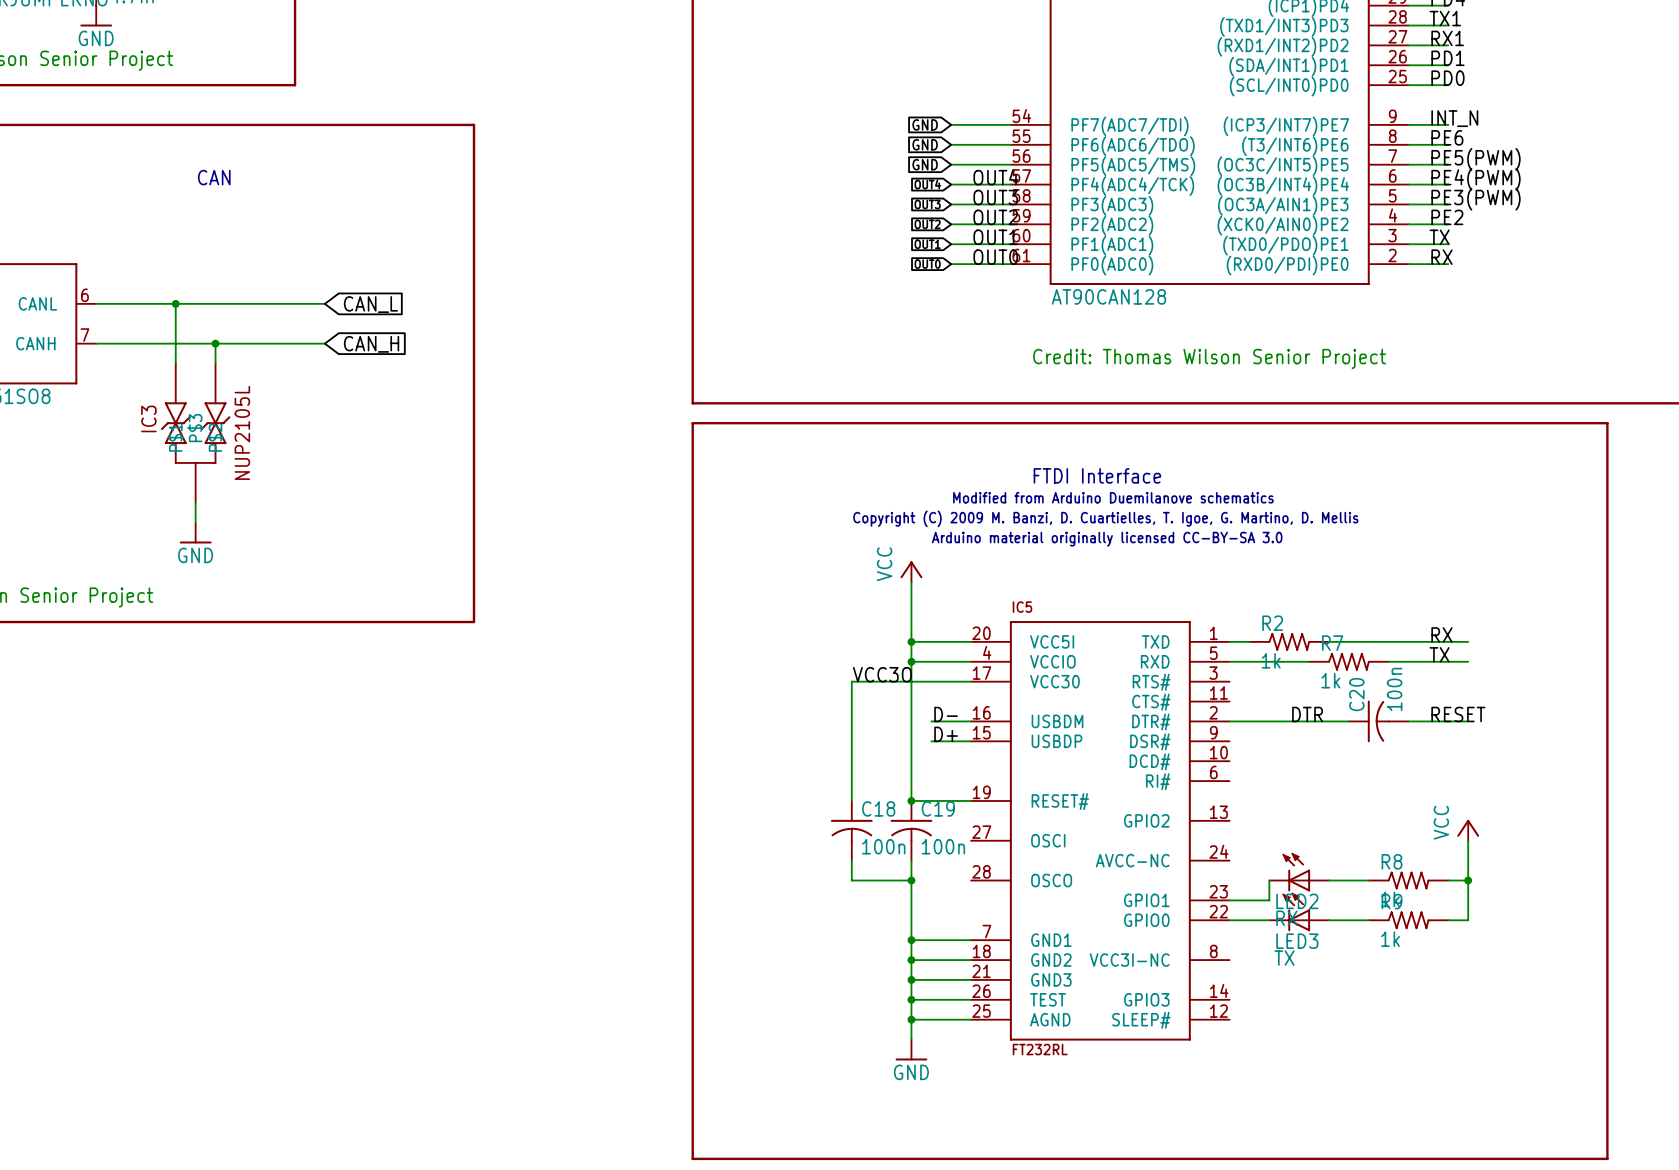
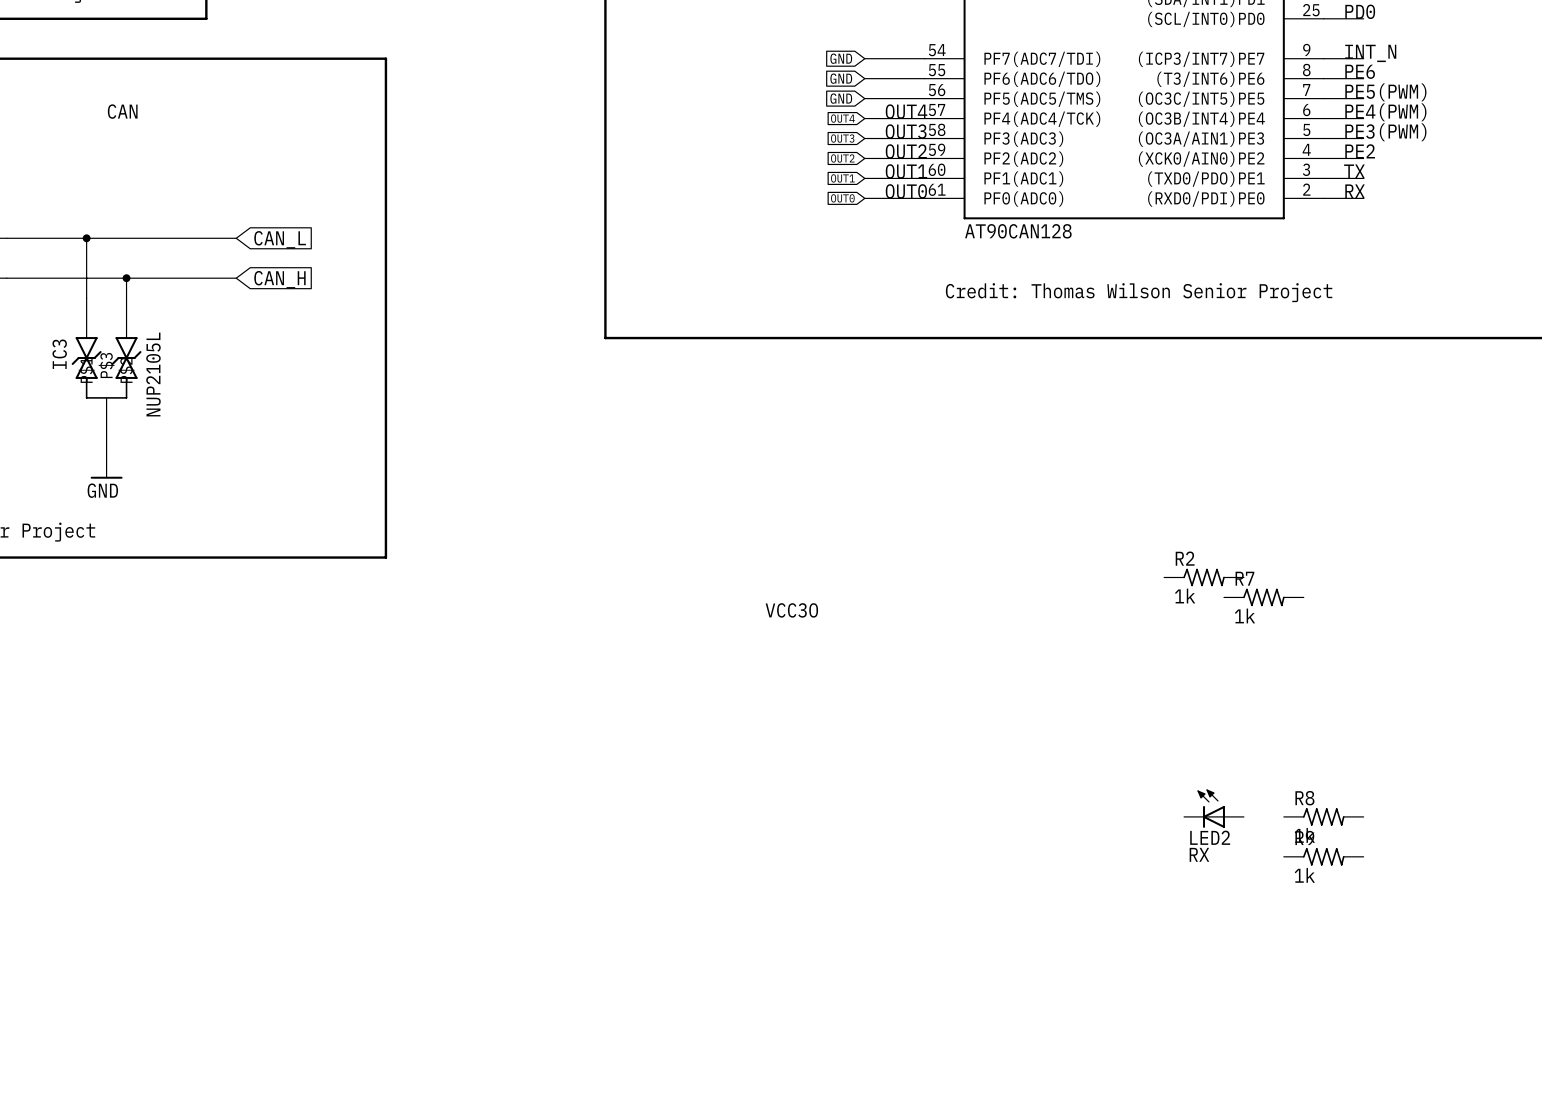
line: (692, 423) (1607, 423) (1607, 1158) (692, 1158) (692, 423) -> none
text: FTDI Interface (1097, 475) -> none
text: Modified from Arduino Duemilanove schematics (1113, 497) -> none
text: Copyright (C) 2009 M. Banzi, D. Cuartielles, T. Igoe, G. Martino, D. Mellis (1105, 518) -> none
text: Arduino material originally licensed CC-BY-SA 3.0 (1107, 539) -> none
power symbol: VCC (911, 571) -> none
wire: (911, 582) (911, 800) (971, 800) -> none
label: RX (1441, 634) -> none
wire: (911, 641) (971, 641) -> none
junction: (911, 641) -> none
wire: (1229, 641) (1249, 641) -> none
wire: (1329, 641) (1468, 641) -> none
label: TX (1439, 654) -> none
wire: (911, 661) (971, 661) -> none
junction: (911, 661) -> none
wire: (1229, 661) (1309, 661) -> none
wire: (1388, 661) (1468, 661) -> none
wire: (971, 681) (851, 681) (851, 800) -> none
label: D- (946, 714) -> none
label: DTR (1307, 714) -> none
label: RESET (1458, 714) -> none
wire: (931, 721) (971, 721) -> none
wire: (1229, 721) (1348, 721) -> none
C20: 100n (1378, 721) -> none
wire: (1408, 721) (1468, 721) -> none
label: D+ (946, 734) -> none
wire: (931, 741) (971, 741) -> none
junction: (911, 800) -> none
C18: 100n (851, 830) -> none
C19: 100n (911, 830) -> none
IC5: FT232RL (1100, 830) -> none
power symbol: VCC (1468, 830) -> none
wire: (1468, 840) (1468, 920) (1448, 920) -> none
wire: (851, 860) (851, 880) (911, 880) -> none
wire: (911, 860) (911, 1039) -> none
junction: (911, 880) -> none
wire: (1269, 880) (1269, 900) (1229, 900) -> none
wire: (1329, 880) (1368, 880) -> none
wire: (1448, 880) (1468, 880) -> none
junction: (1468, 880) -> none
LED3: TX (1299, 912) -> none
wire: (1229, 920) (1269, 920) -> none
wire: (1329, 920) (1368, 920) -> none
wire: (911, 940) (971, 940) -> none
junction: (911, 940) -> none
wire: (911, 960) (971, 960) -> none
junction: (911, 960) -> none
wire: (911, 979) (971, 979) -> none
junction: (911, 979) -> none
wire: (911, 999) (971, 999) -> none
junction: (911, 999) -> none
wire: (911, 1019) (971, 1019) -> none
junction: (911, 1019) -> none
power symbol: GND (911, 1050) -> none

